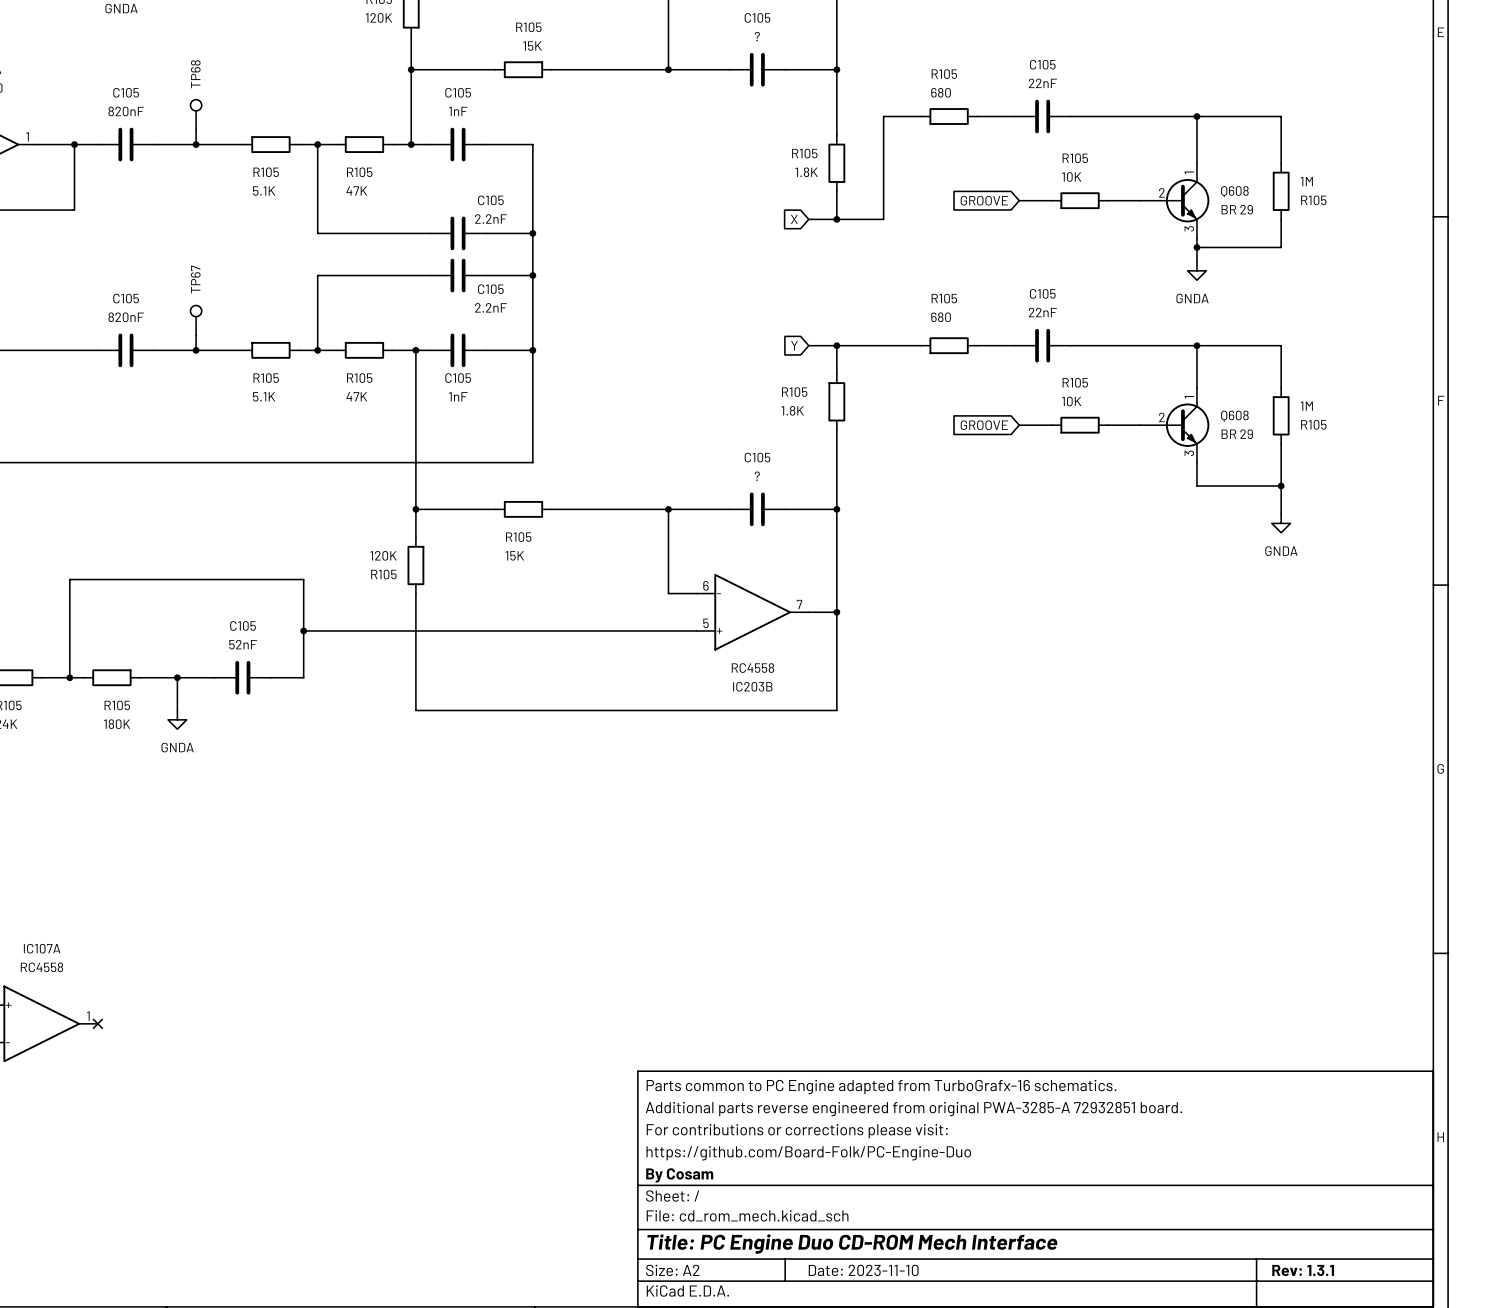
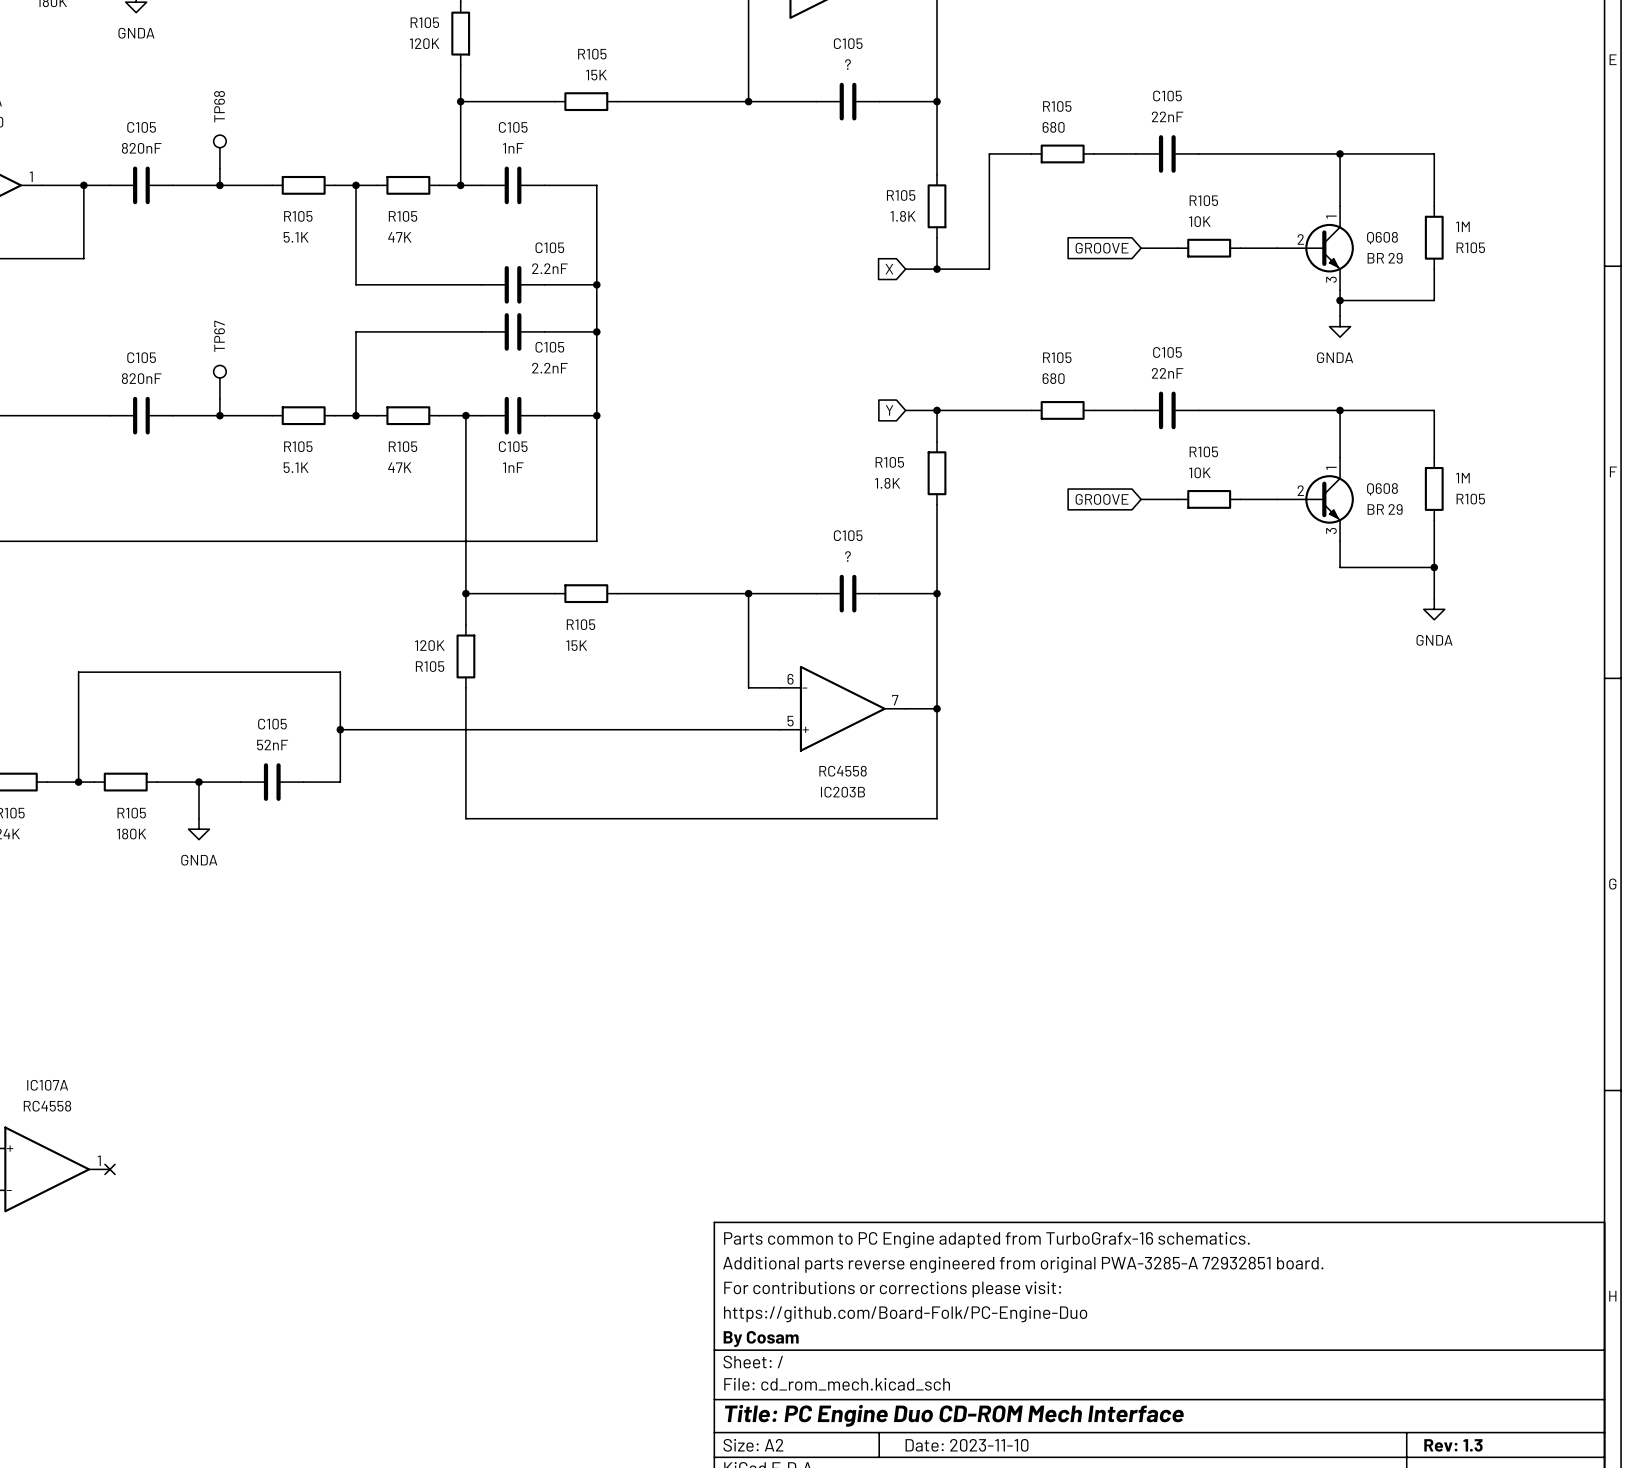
title block: Rev: 1.3.1 (1303, 1270) -> Rev: 1.3 (1453, 1445)

